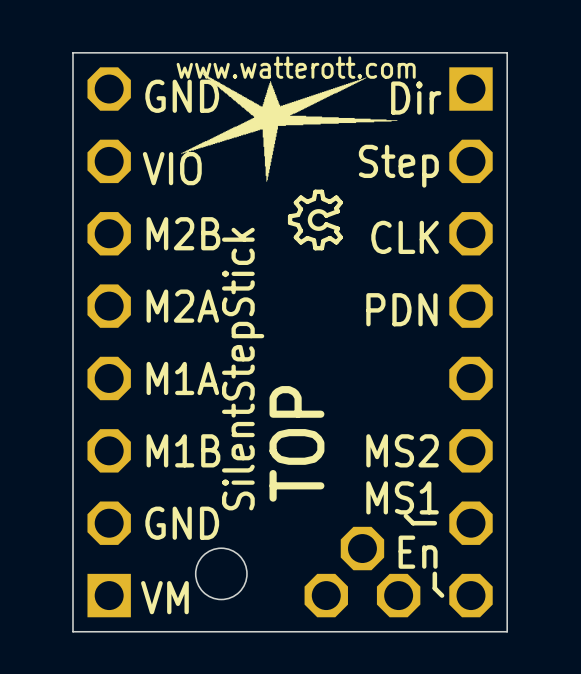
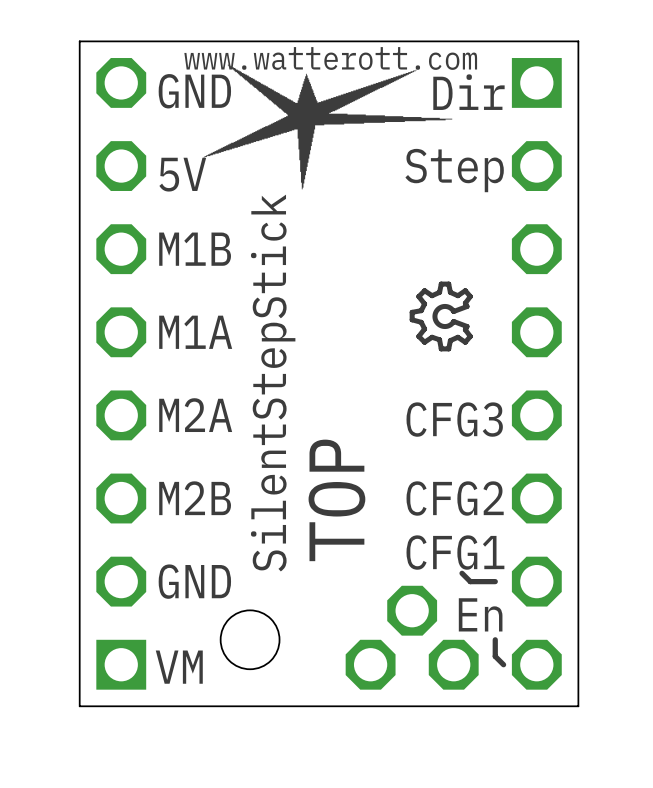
text: VIO (172, 168) -> 5V (182, 174)
drawing position: (315, 220) -> (441, 316)
text: M2B (183, 233) -> M1B (195, 249)
text: CLK (405, 237) -> none
text: M2A (182, 306) -> M1A (195, 332)
text: PDN (401, 309) -> none
text: M1A (182, 378) -> M2A (195, 415)
text: none -> CFG3 (454, 419)
text: M1B (183, 450) -> M2B (195, 498)
text: MS2 (402, 450) -> CFG2 (455, 498)
text: MS1 (402, 497) -> CFG1 (455, 552)

